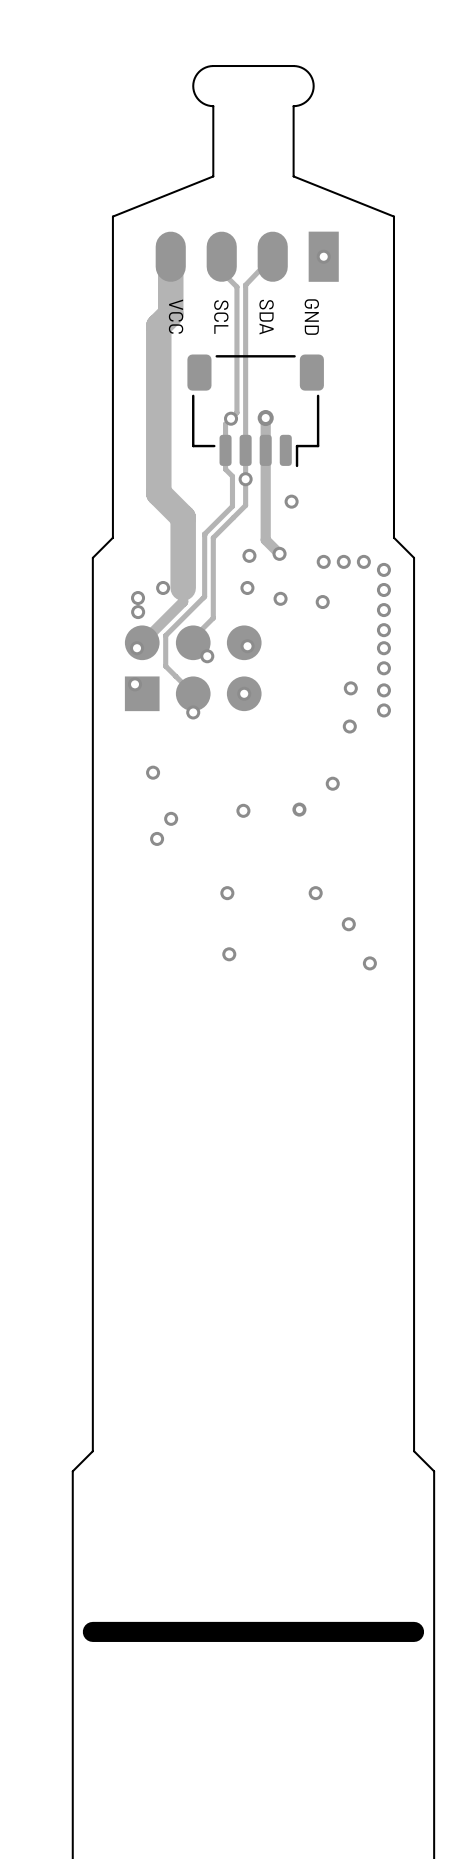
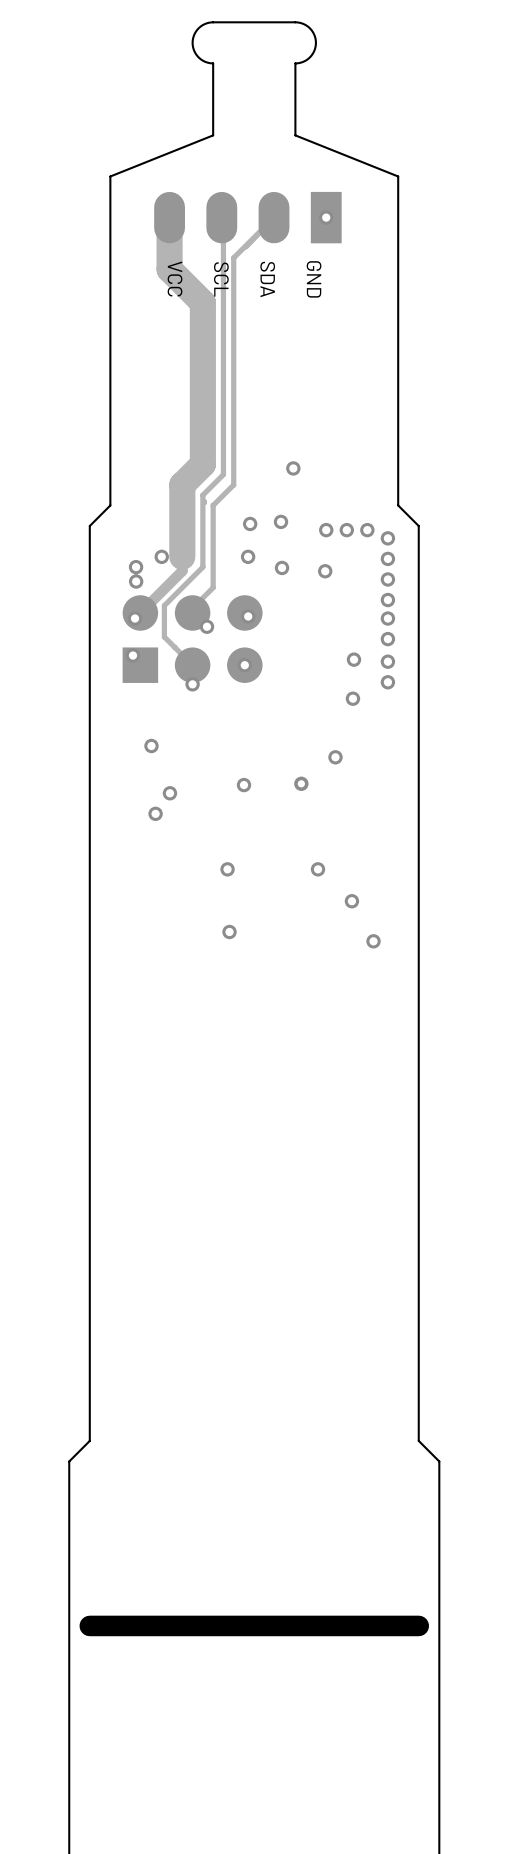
track: (214, 264) (236, 286) (236, 412) (225, 424) (225, 469) (232, 476) (232, 506) (204, 534) -> none
track: (245, 285) (245, 505) (233, 517) -> (274, 217) (233, 257) (233, 484)
track: (170, 307) (170, 314) (158, 326) (158, 493) (183, 517) -> (169, 269) (202, 302) (202, 464) (182, 484)
part: (255, 410) -> none
via: (231, 418) -> none
track: (265, 418) (265, 540) (279, 553) -> none
via: (265, 418) -> none
via: (245, 479) -> none
track: (204, 535) (203, 598) -> (223, 219) (223, 474) (202, 495) (202, 567)

